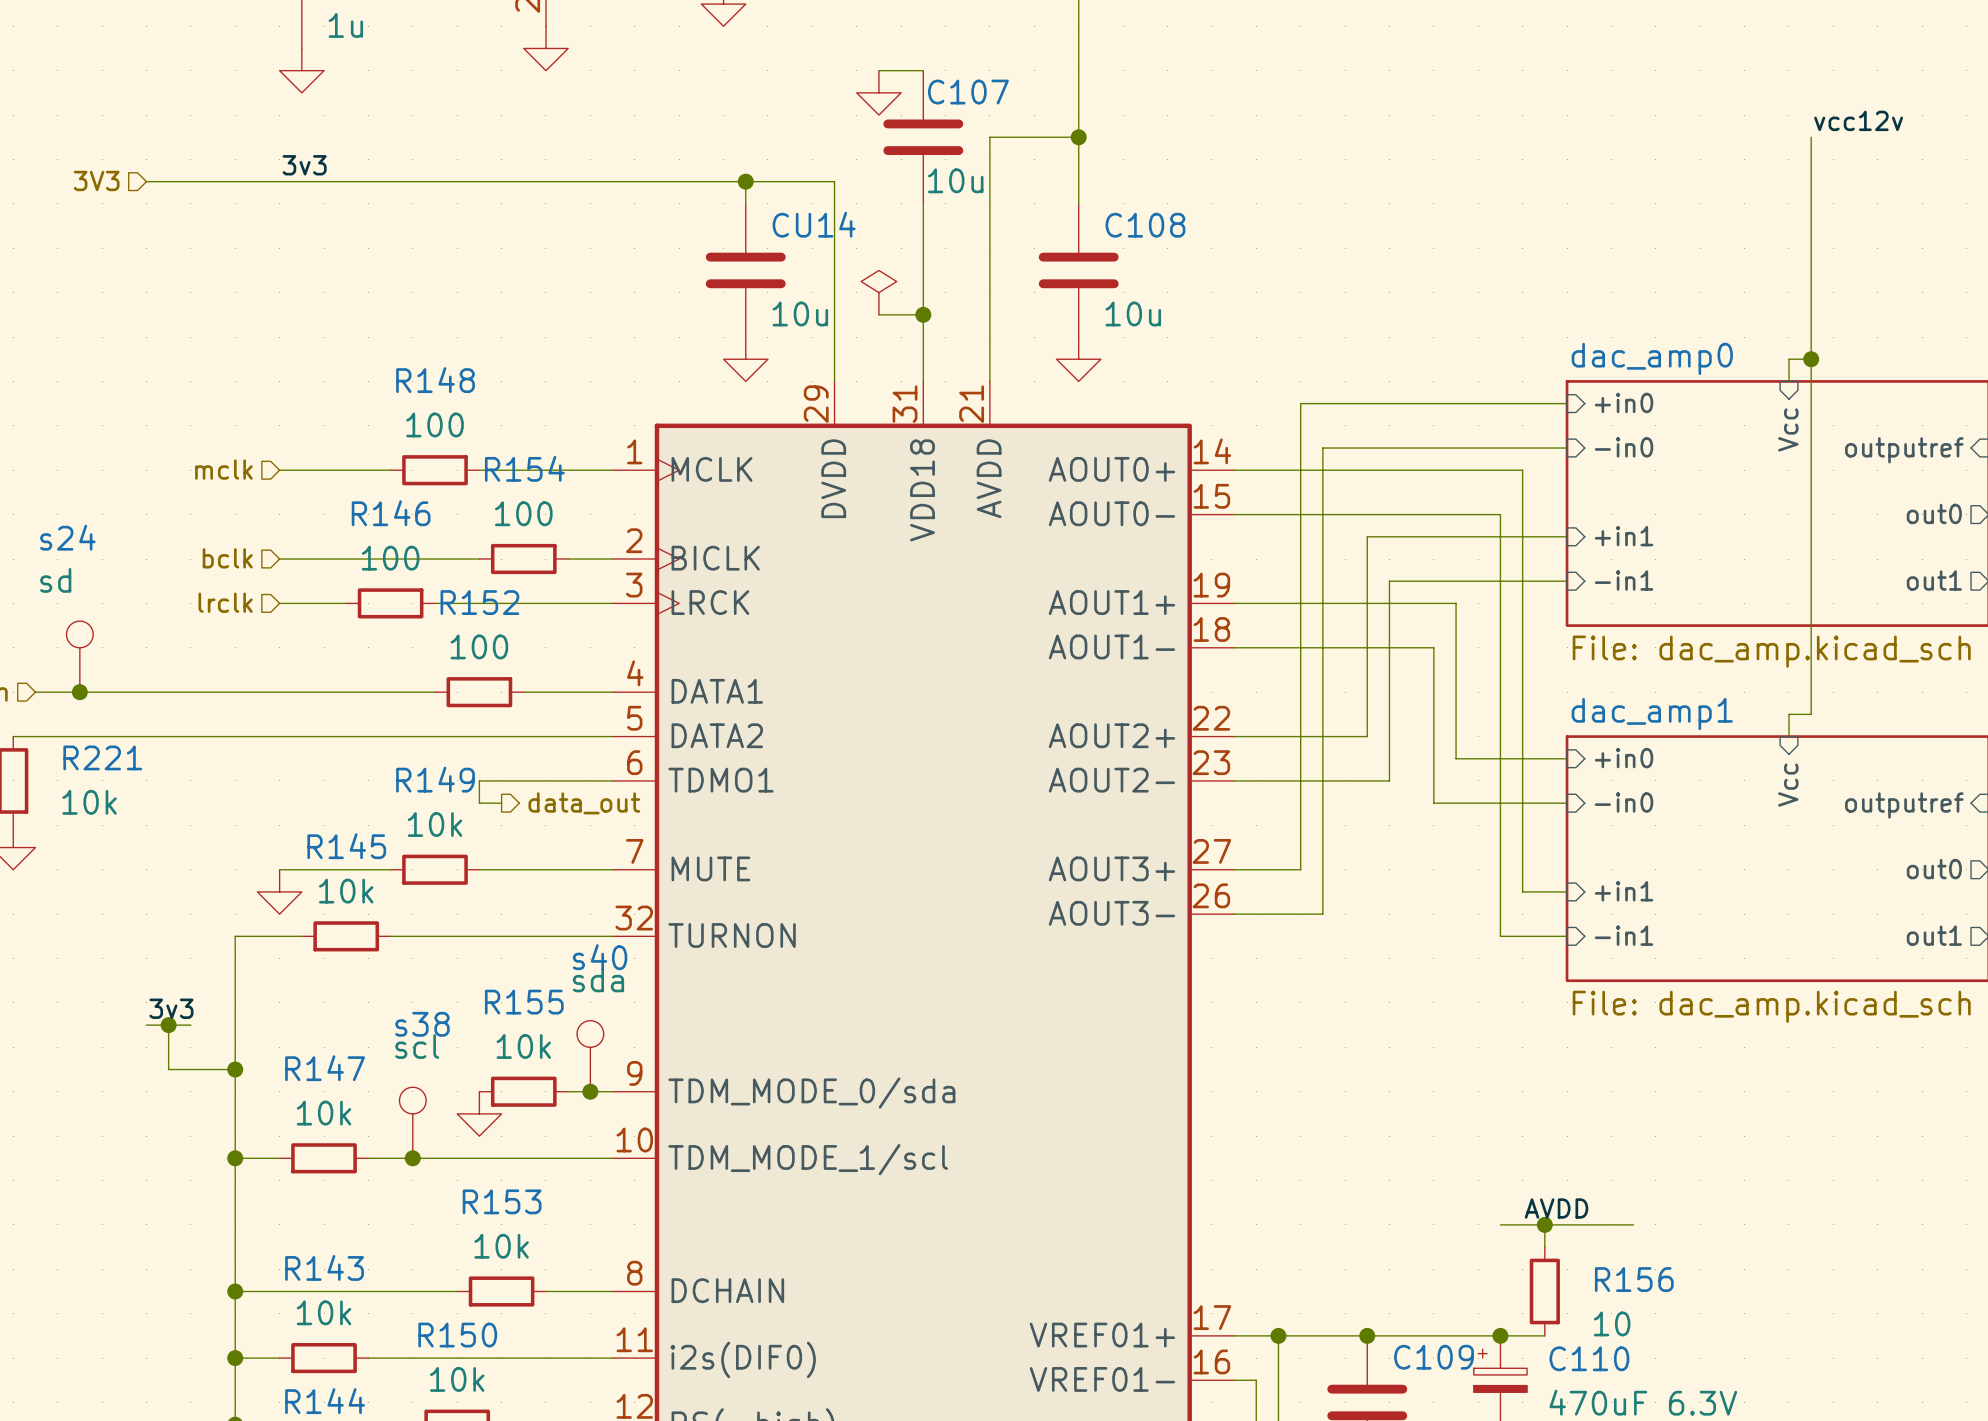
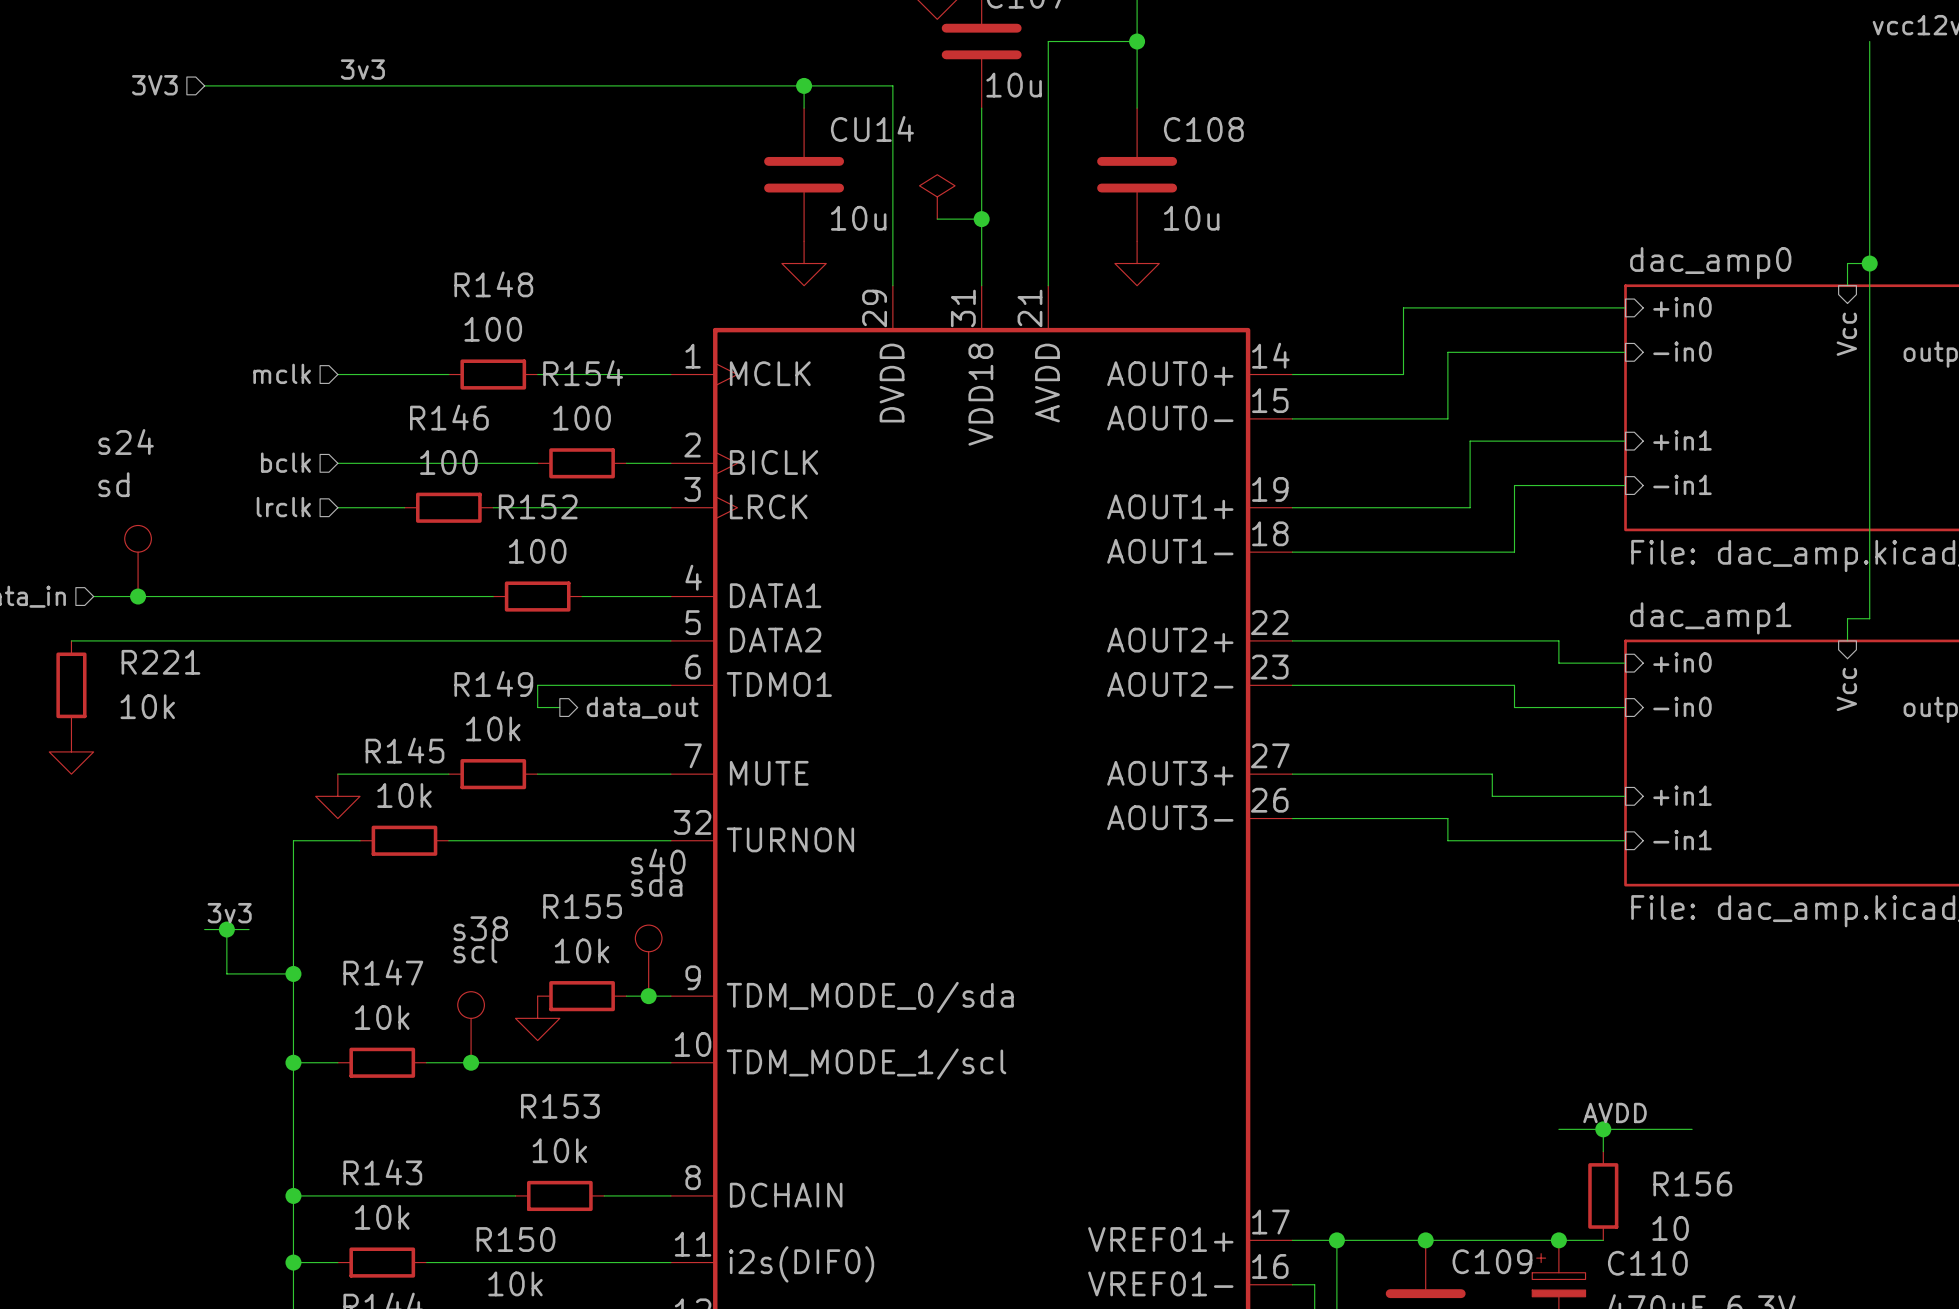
wire: (1345, 403) (1300, 403) (1300, 869) -> (1403, 307) (1403, 374)
wire: (1389, 448) (1322, 448) (1322, 914) -> (1447, 352) (1447, 418)
wire: (1345, 470) (1522, 470) (1522, 891) -> (1359, 774) (1492, 774) (1492, 796) (1581, 796)
wire: (1389, 514) (1500, 514) (1500, 736) -> (1425, 640) (1558, 640)
wire: (1411, 536) (1367, 536) (1367, 736) -> (1470, 441) (1470, 507)
wire: (1456, 581) (1389, 581) (1389, 780) -> none
wire: (1411, 603) (1456, 603) -> (1514, 485) (1514, 507)
wire: (1433, 647) (1433, 803) (1456, 803) -> (1447, 685) (1514, 685) (1514, 707)
wire: (1456, 647) (1456, 758) (1500, 758) (1500, 936) -> (1514, 552) (1492, 552)
wire: none -> (1381, 818) (1447, 818) (1447, 840) (1558, 840)

